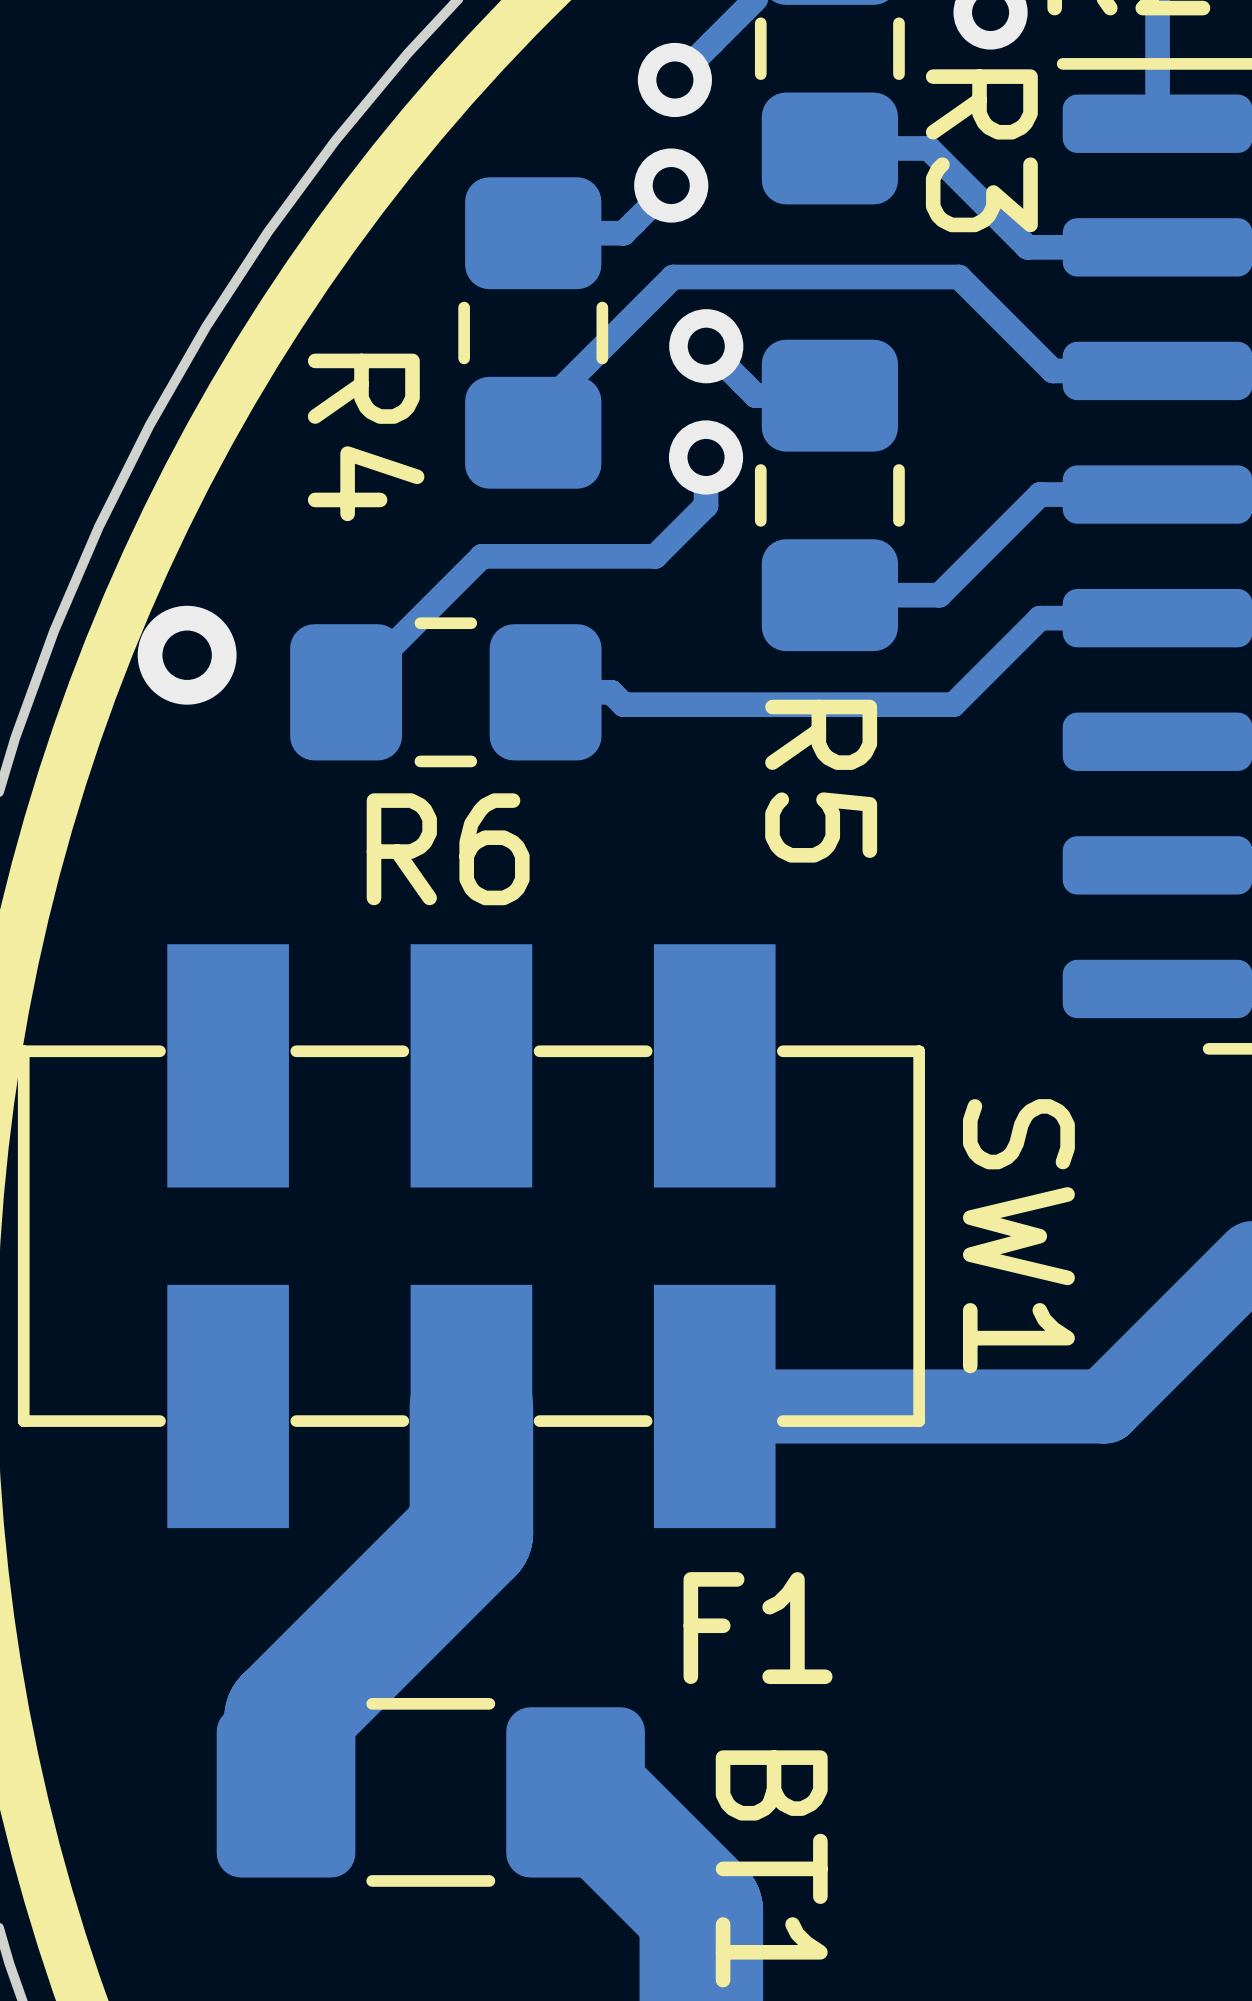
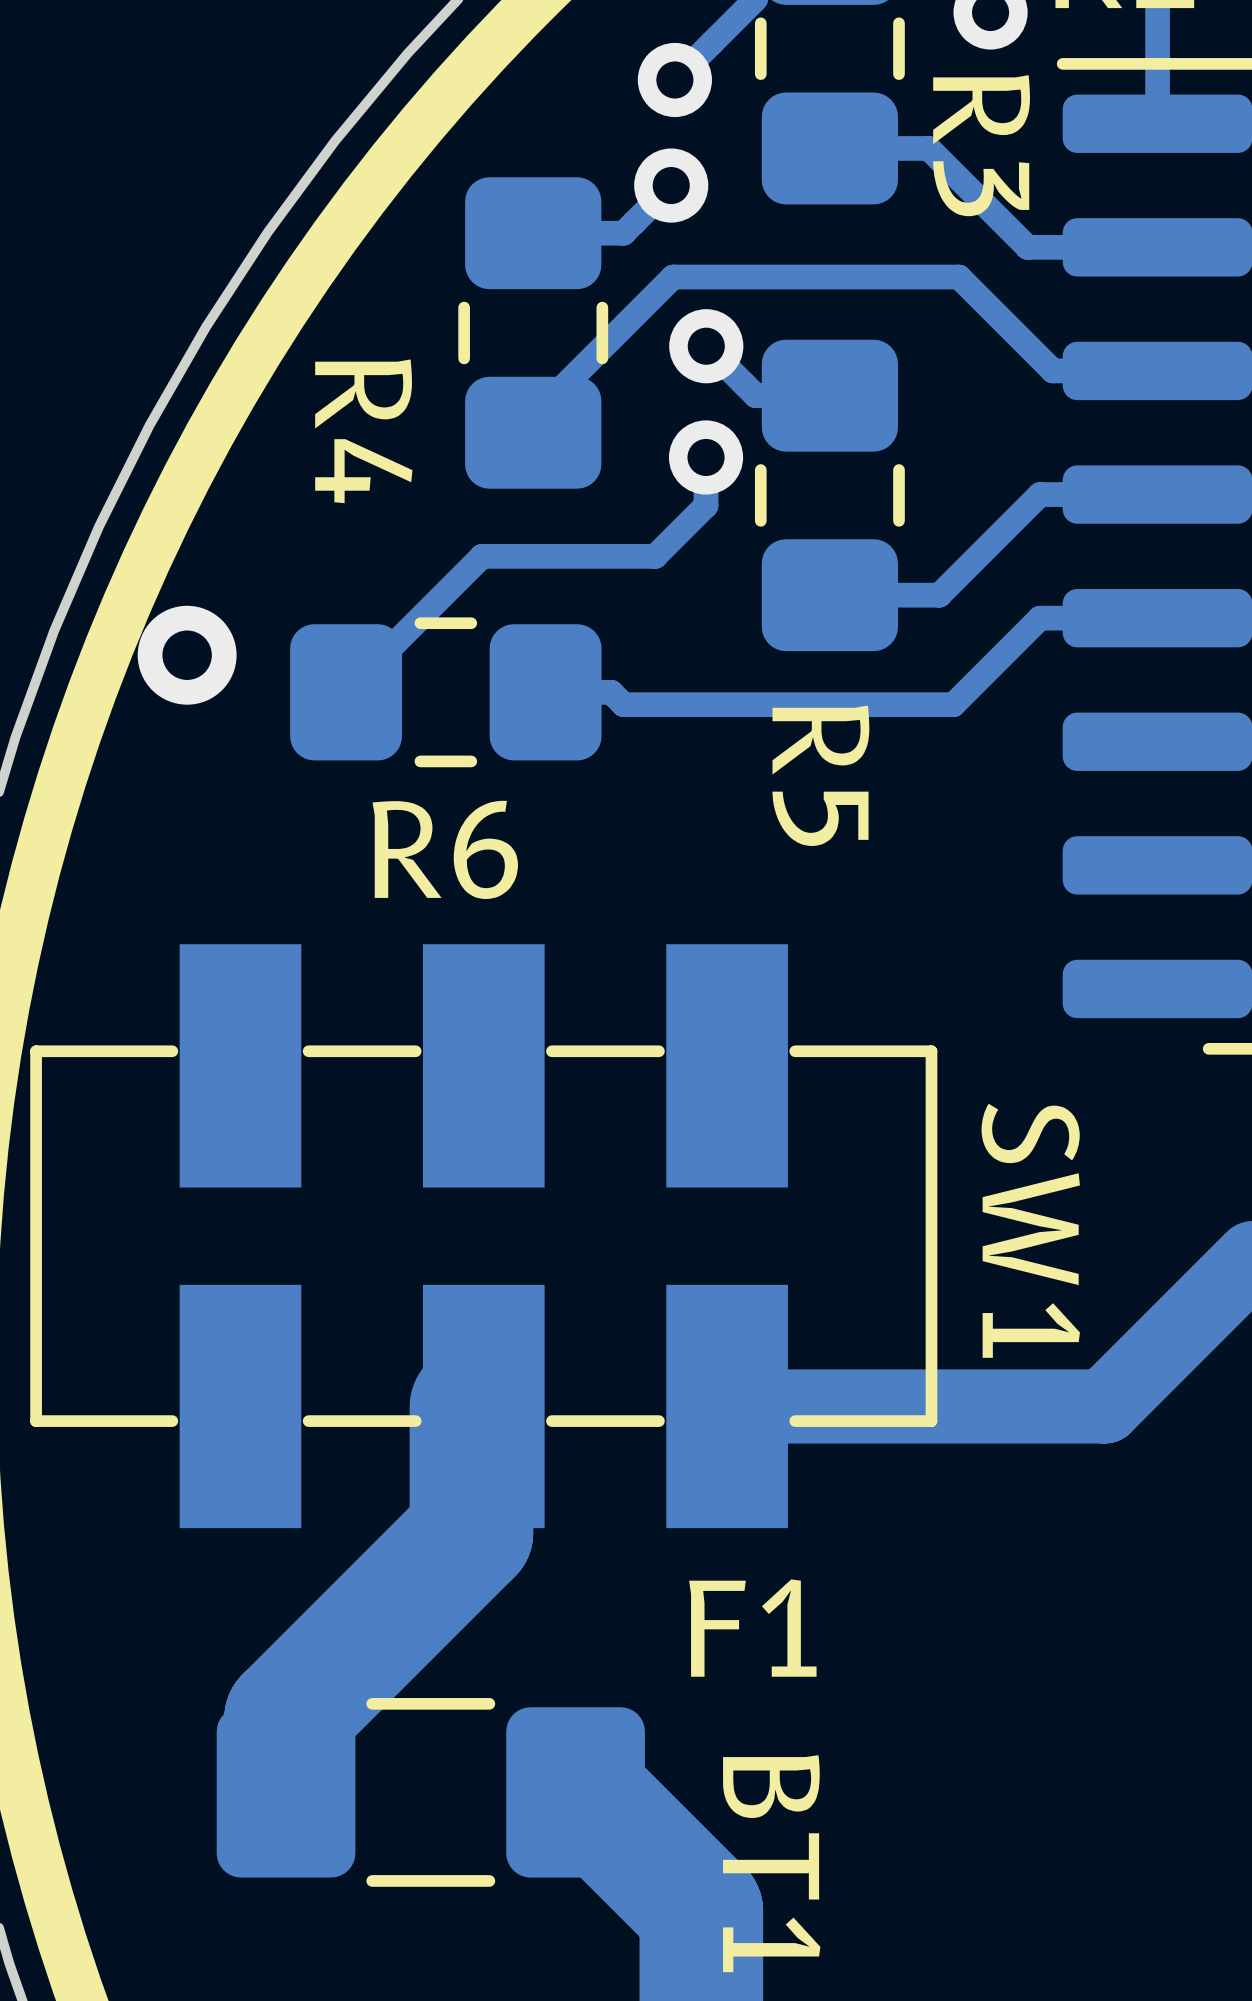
SW1 position: (471, 1236) -> (483, 1236)

